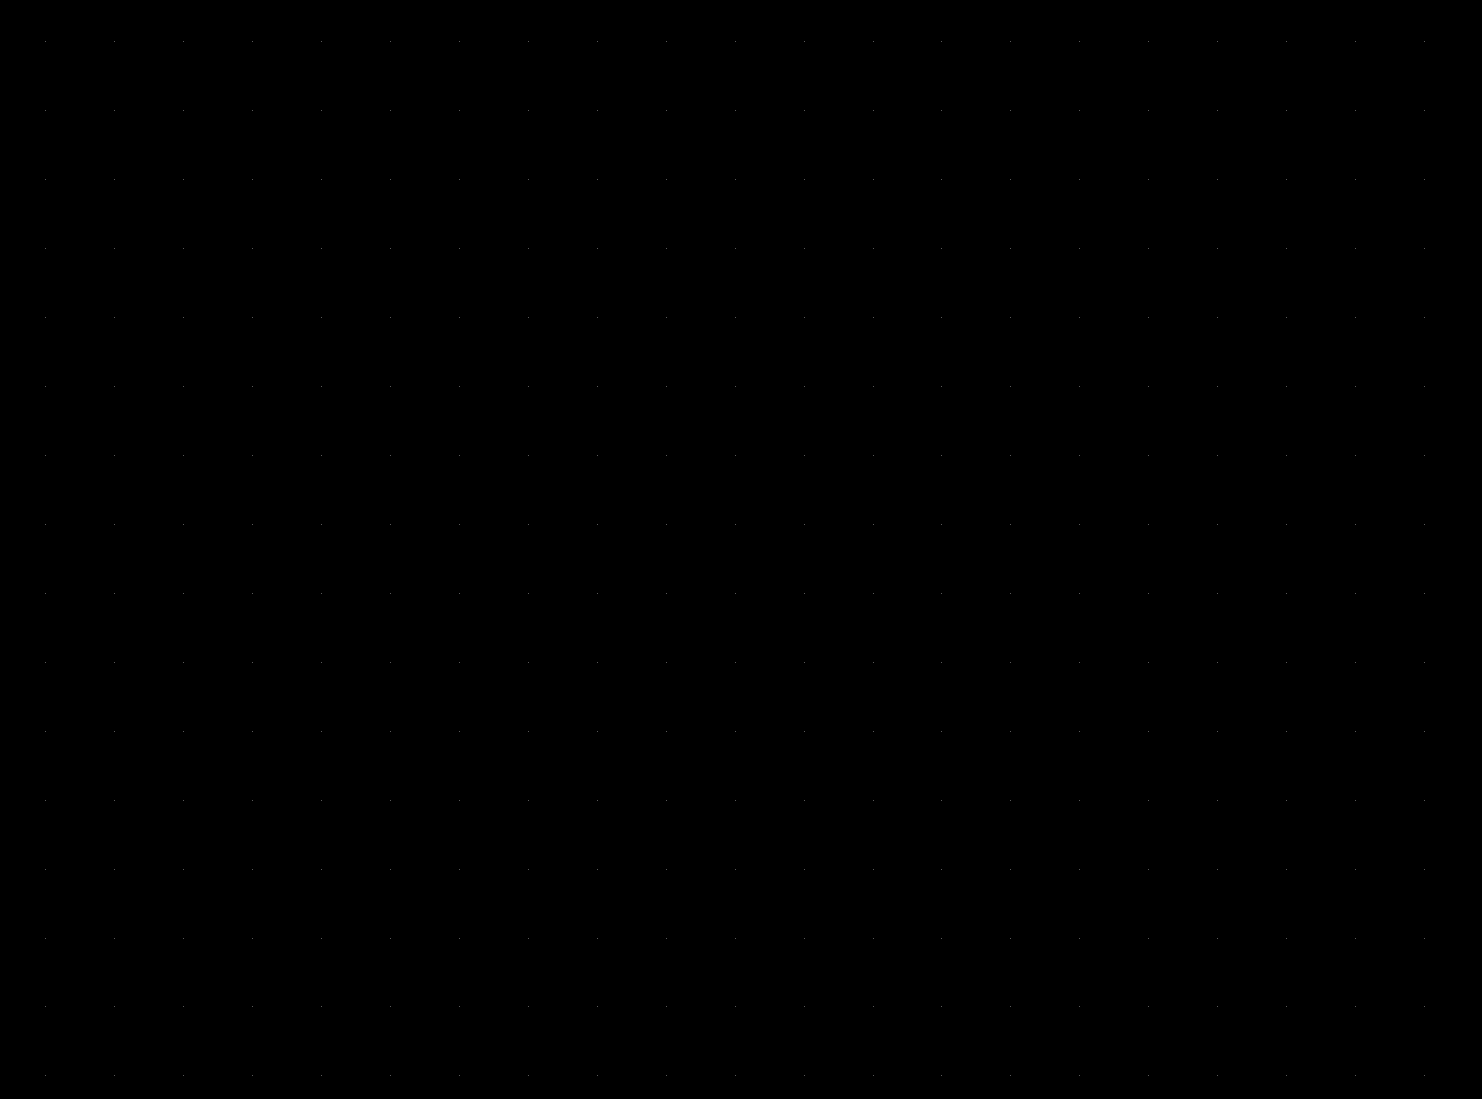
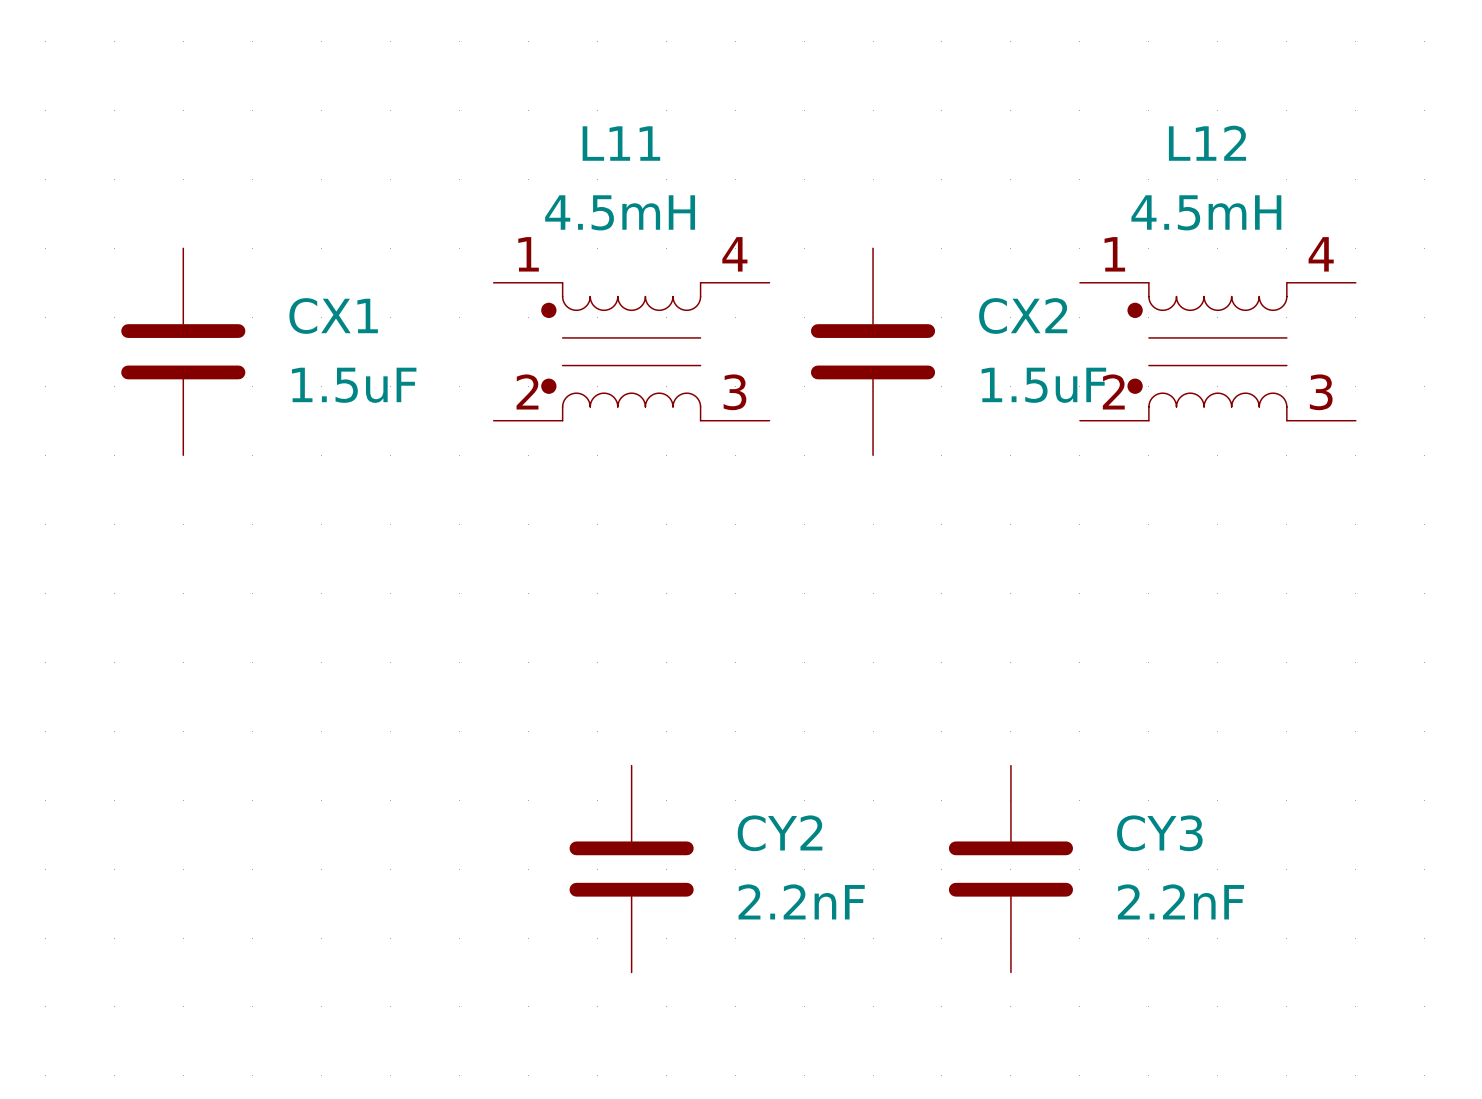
CX1: none -> 1.5uF (183, 351)
L11: none -> 4.5mH (631, 351)
CX2: none -> 1.5uF (873, 351)
L12: none -> 4.5mH (1217, 351)
CY2: none -> 2.2nF (631, 869)
CY3: none -> 2.2nF (1010, 869)

